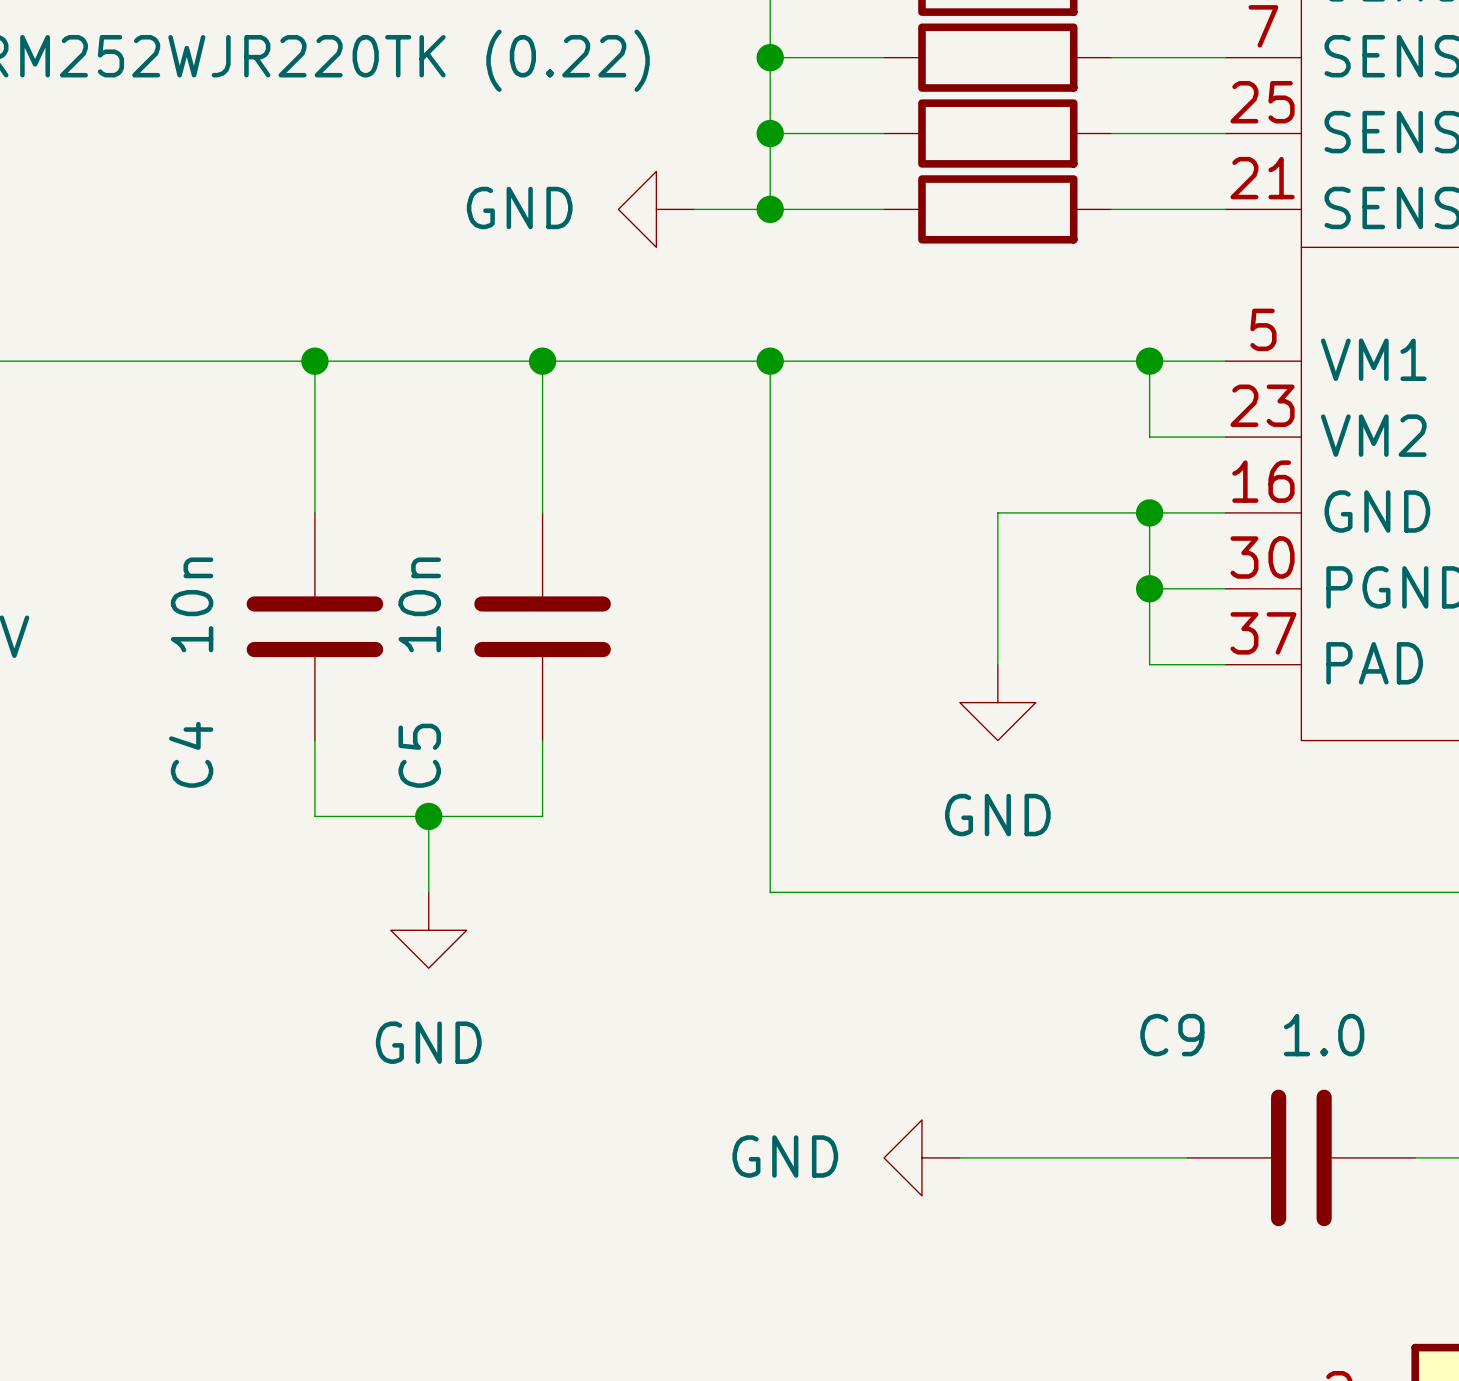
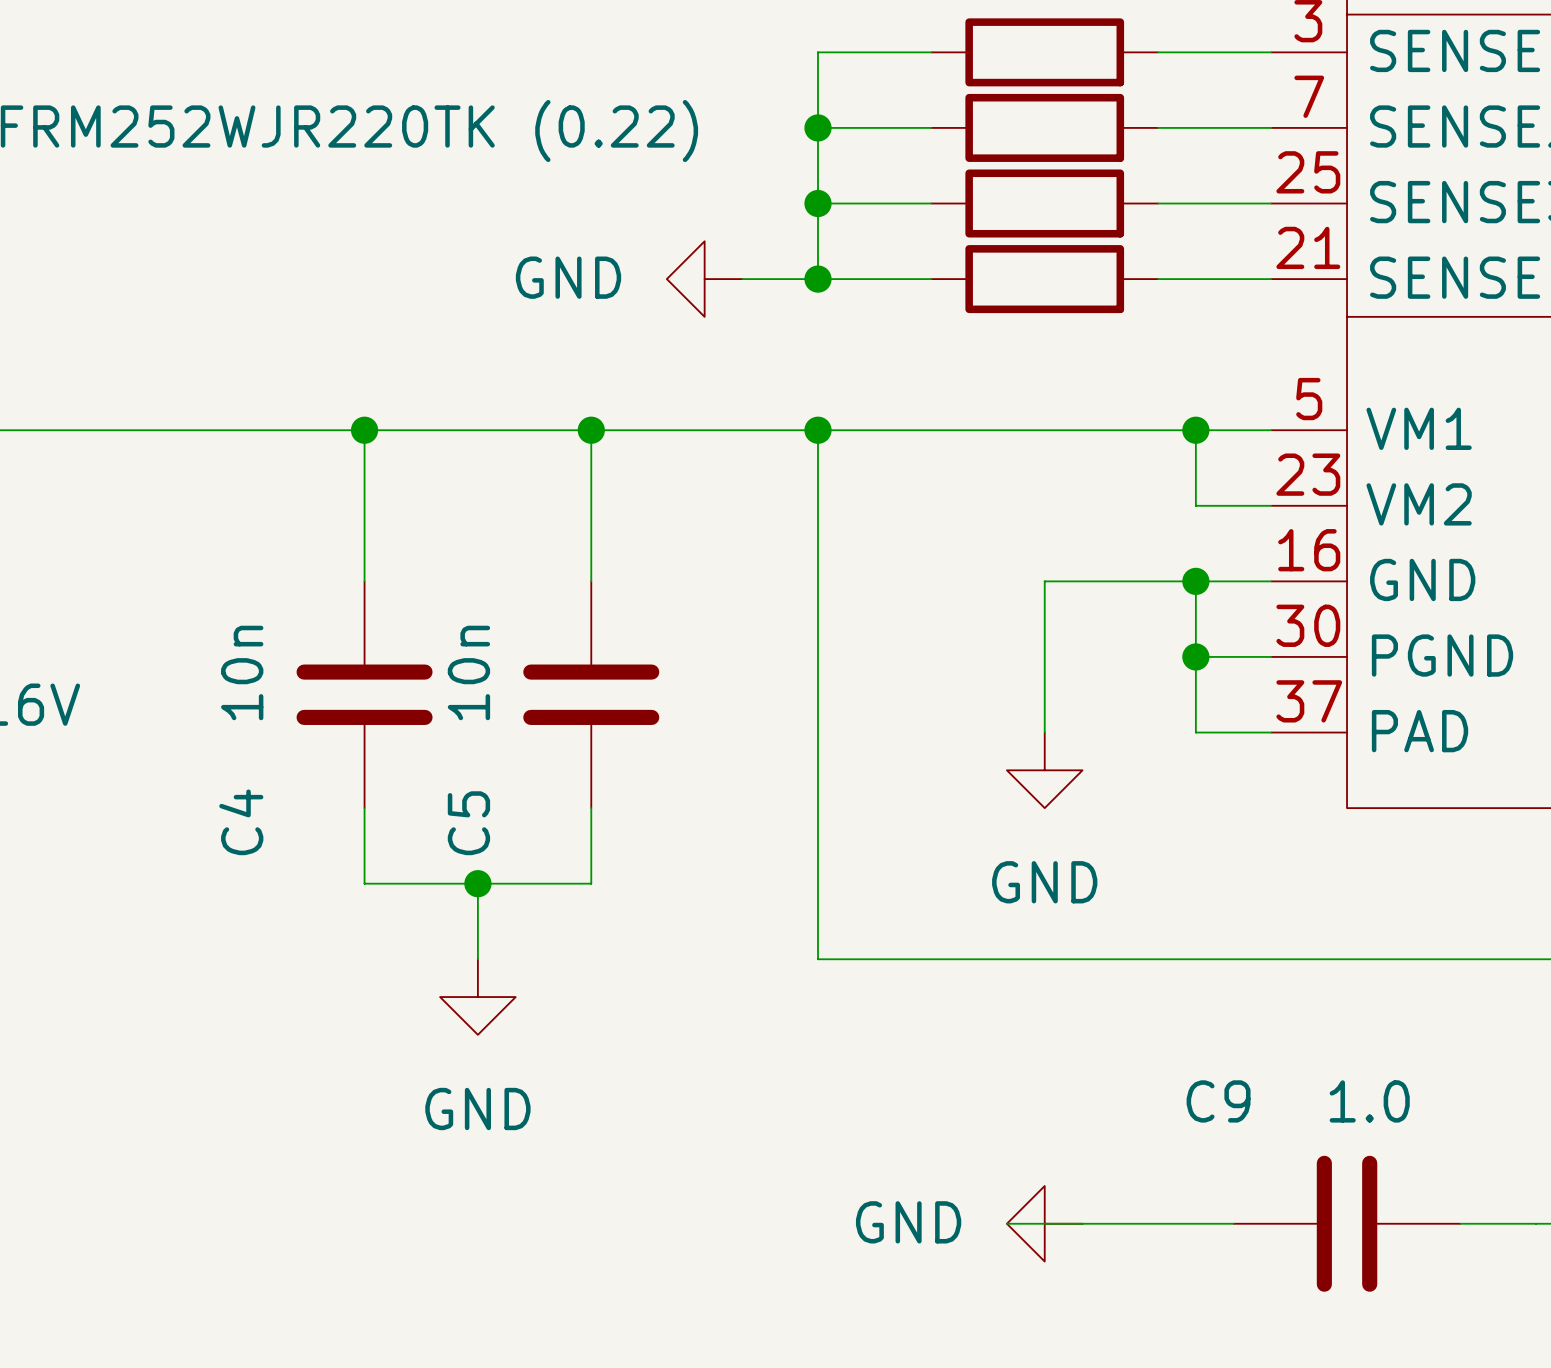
power symbol position: GND (921, 1157) -> GND (1044, 1223)

